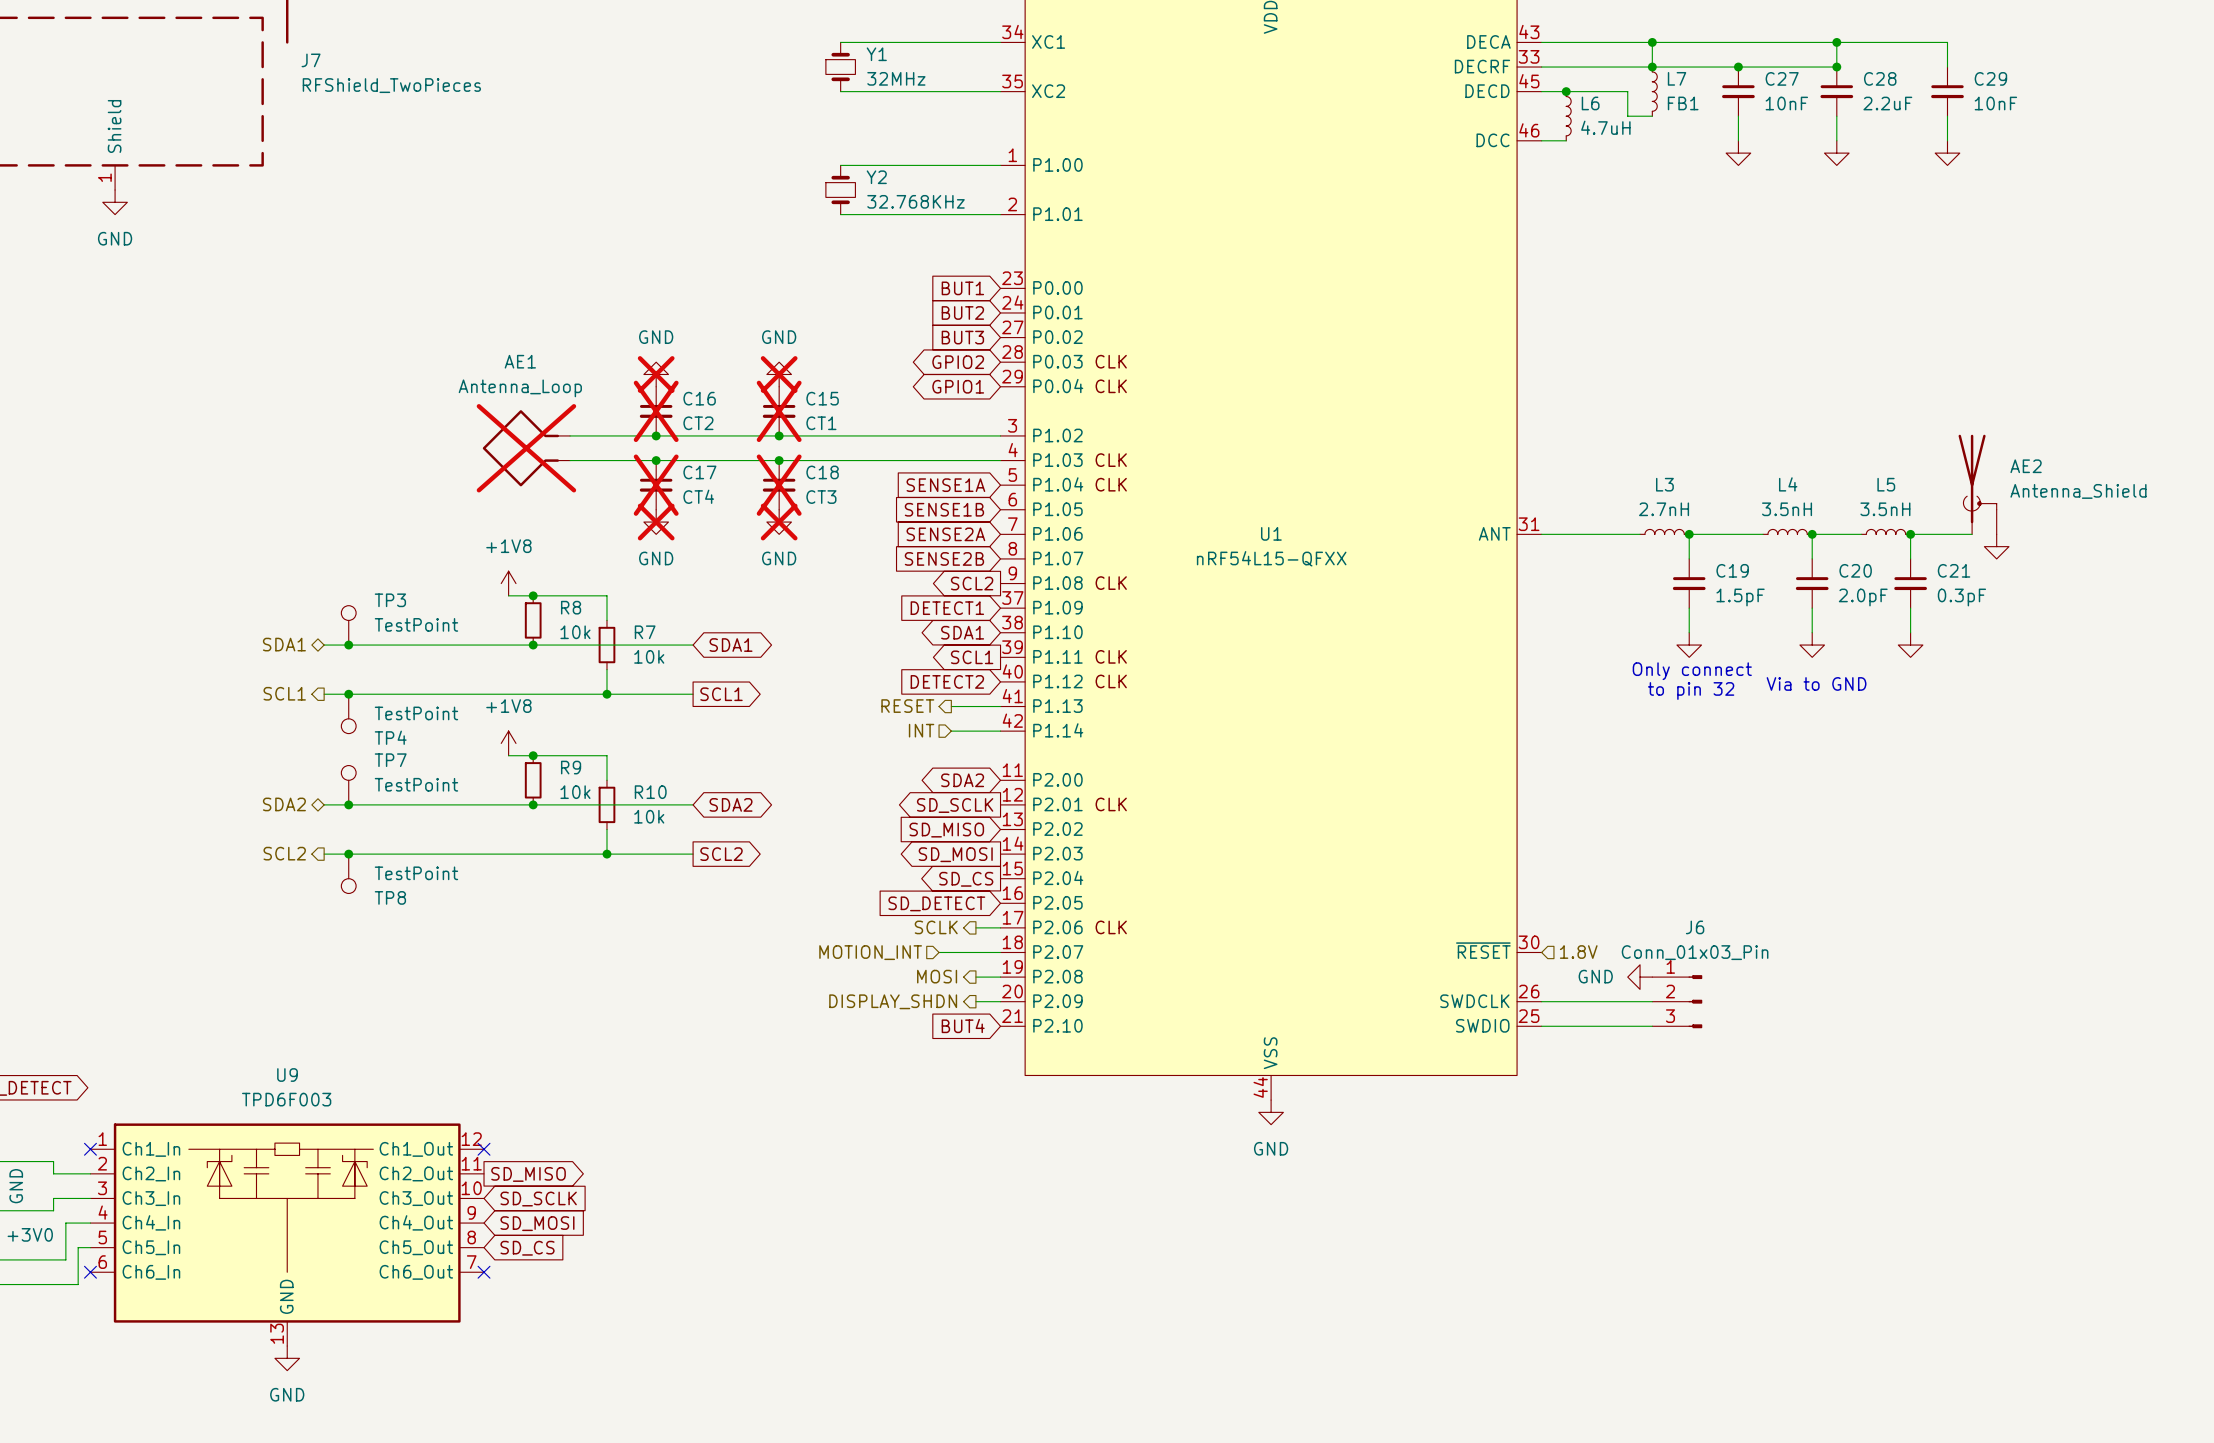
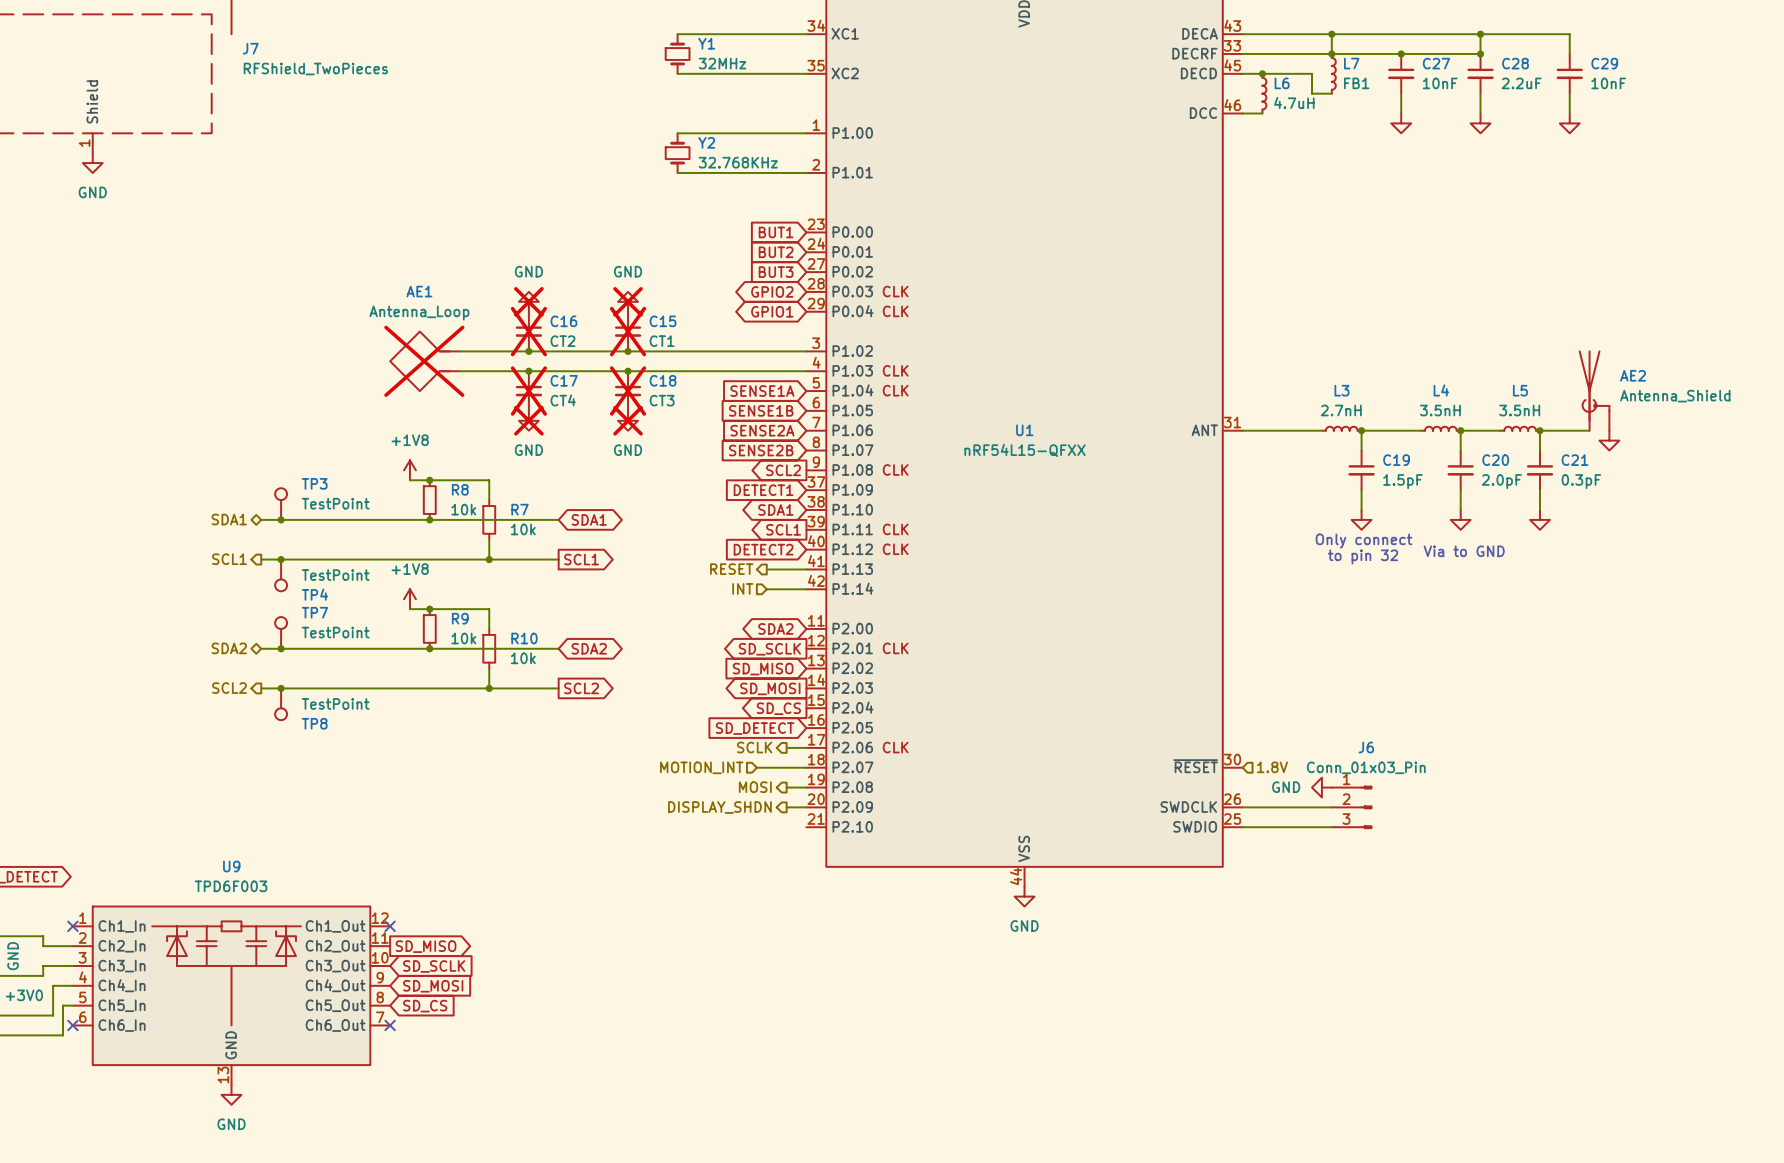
global label: BUT4 (963, 1025) -> none

